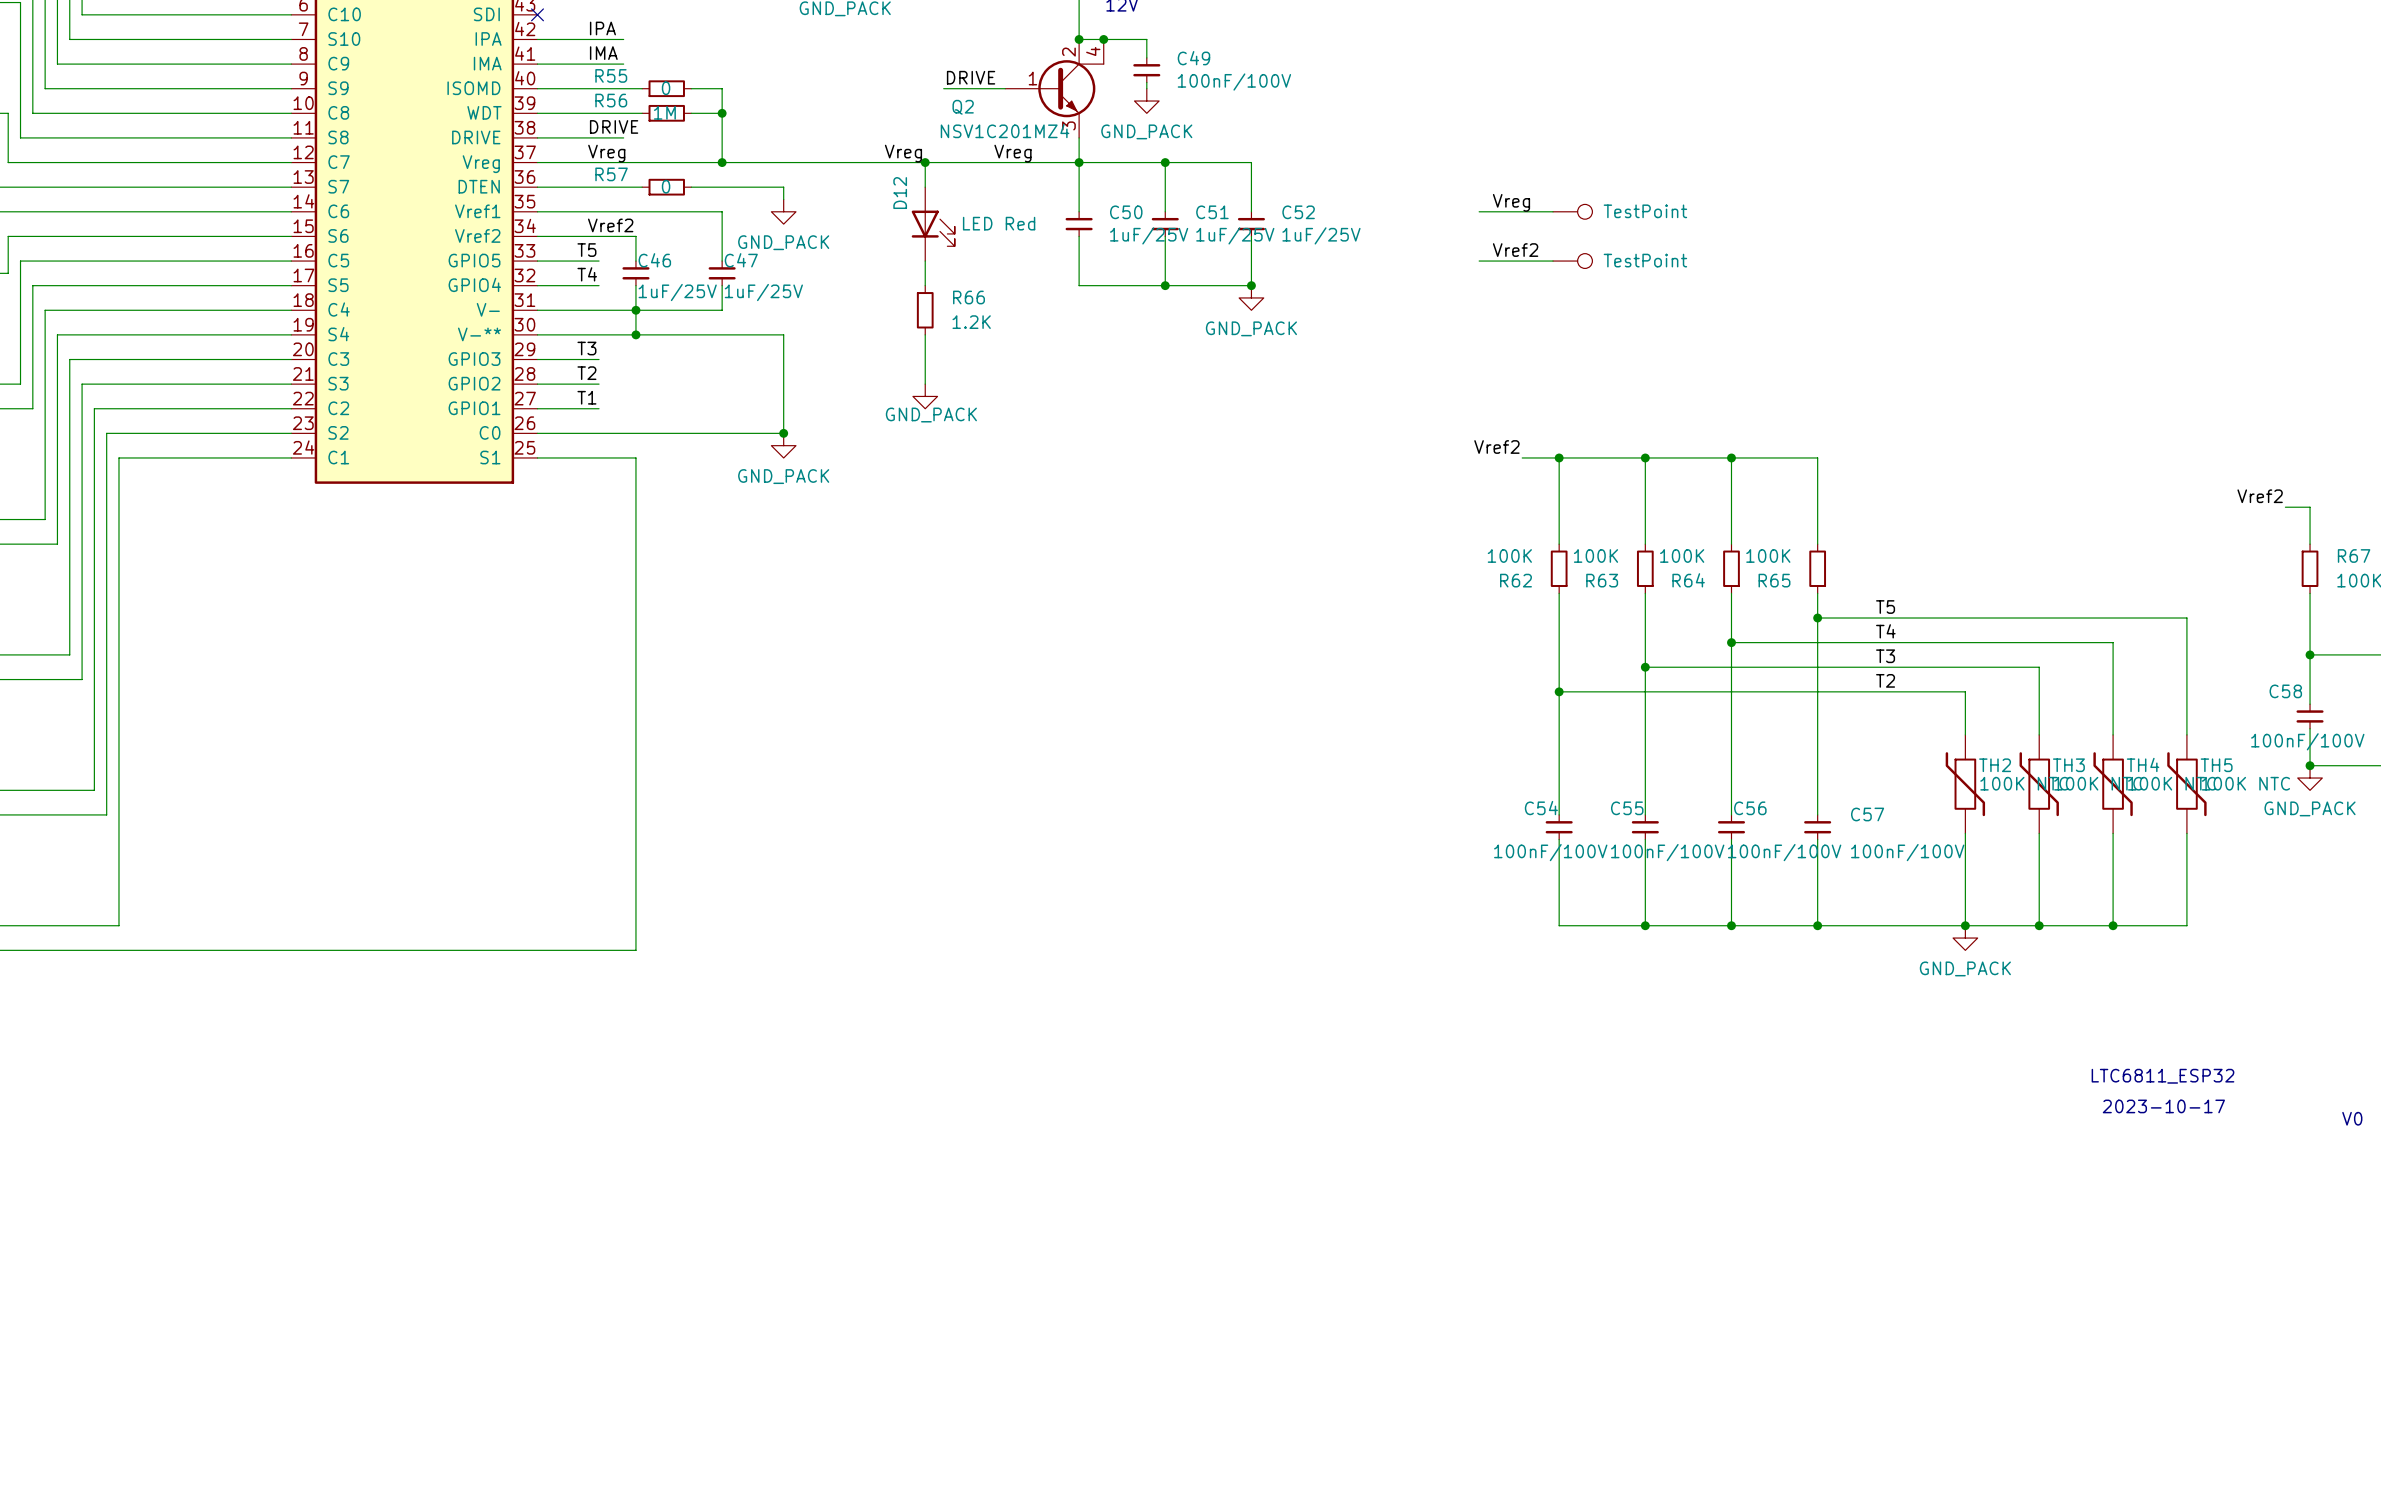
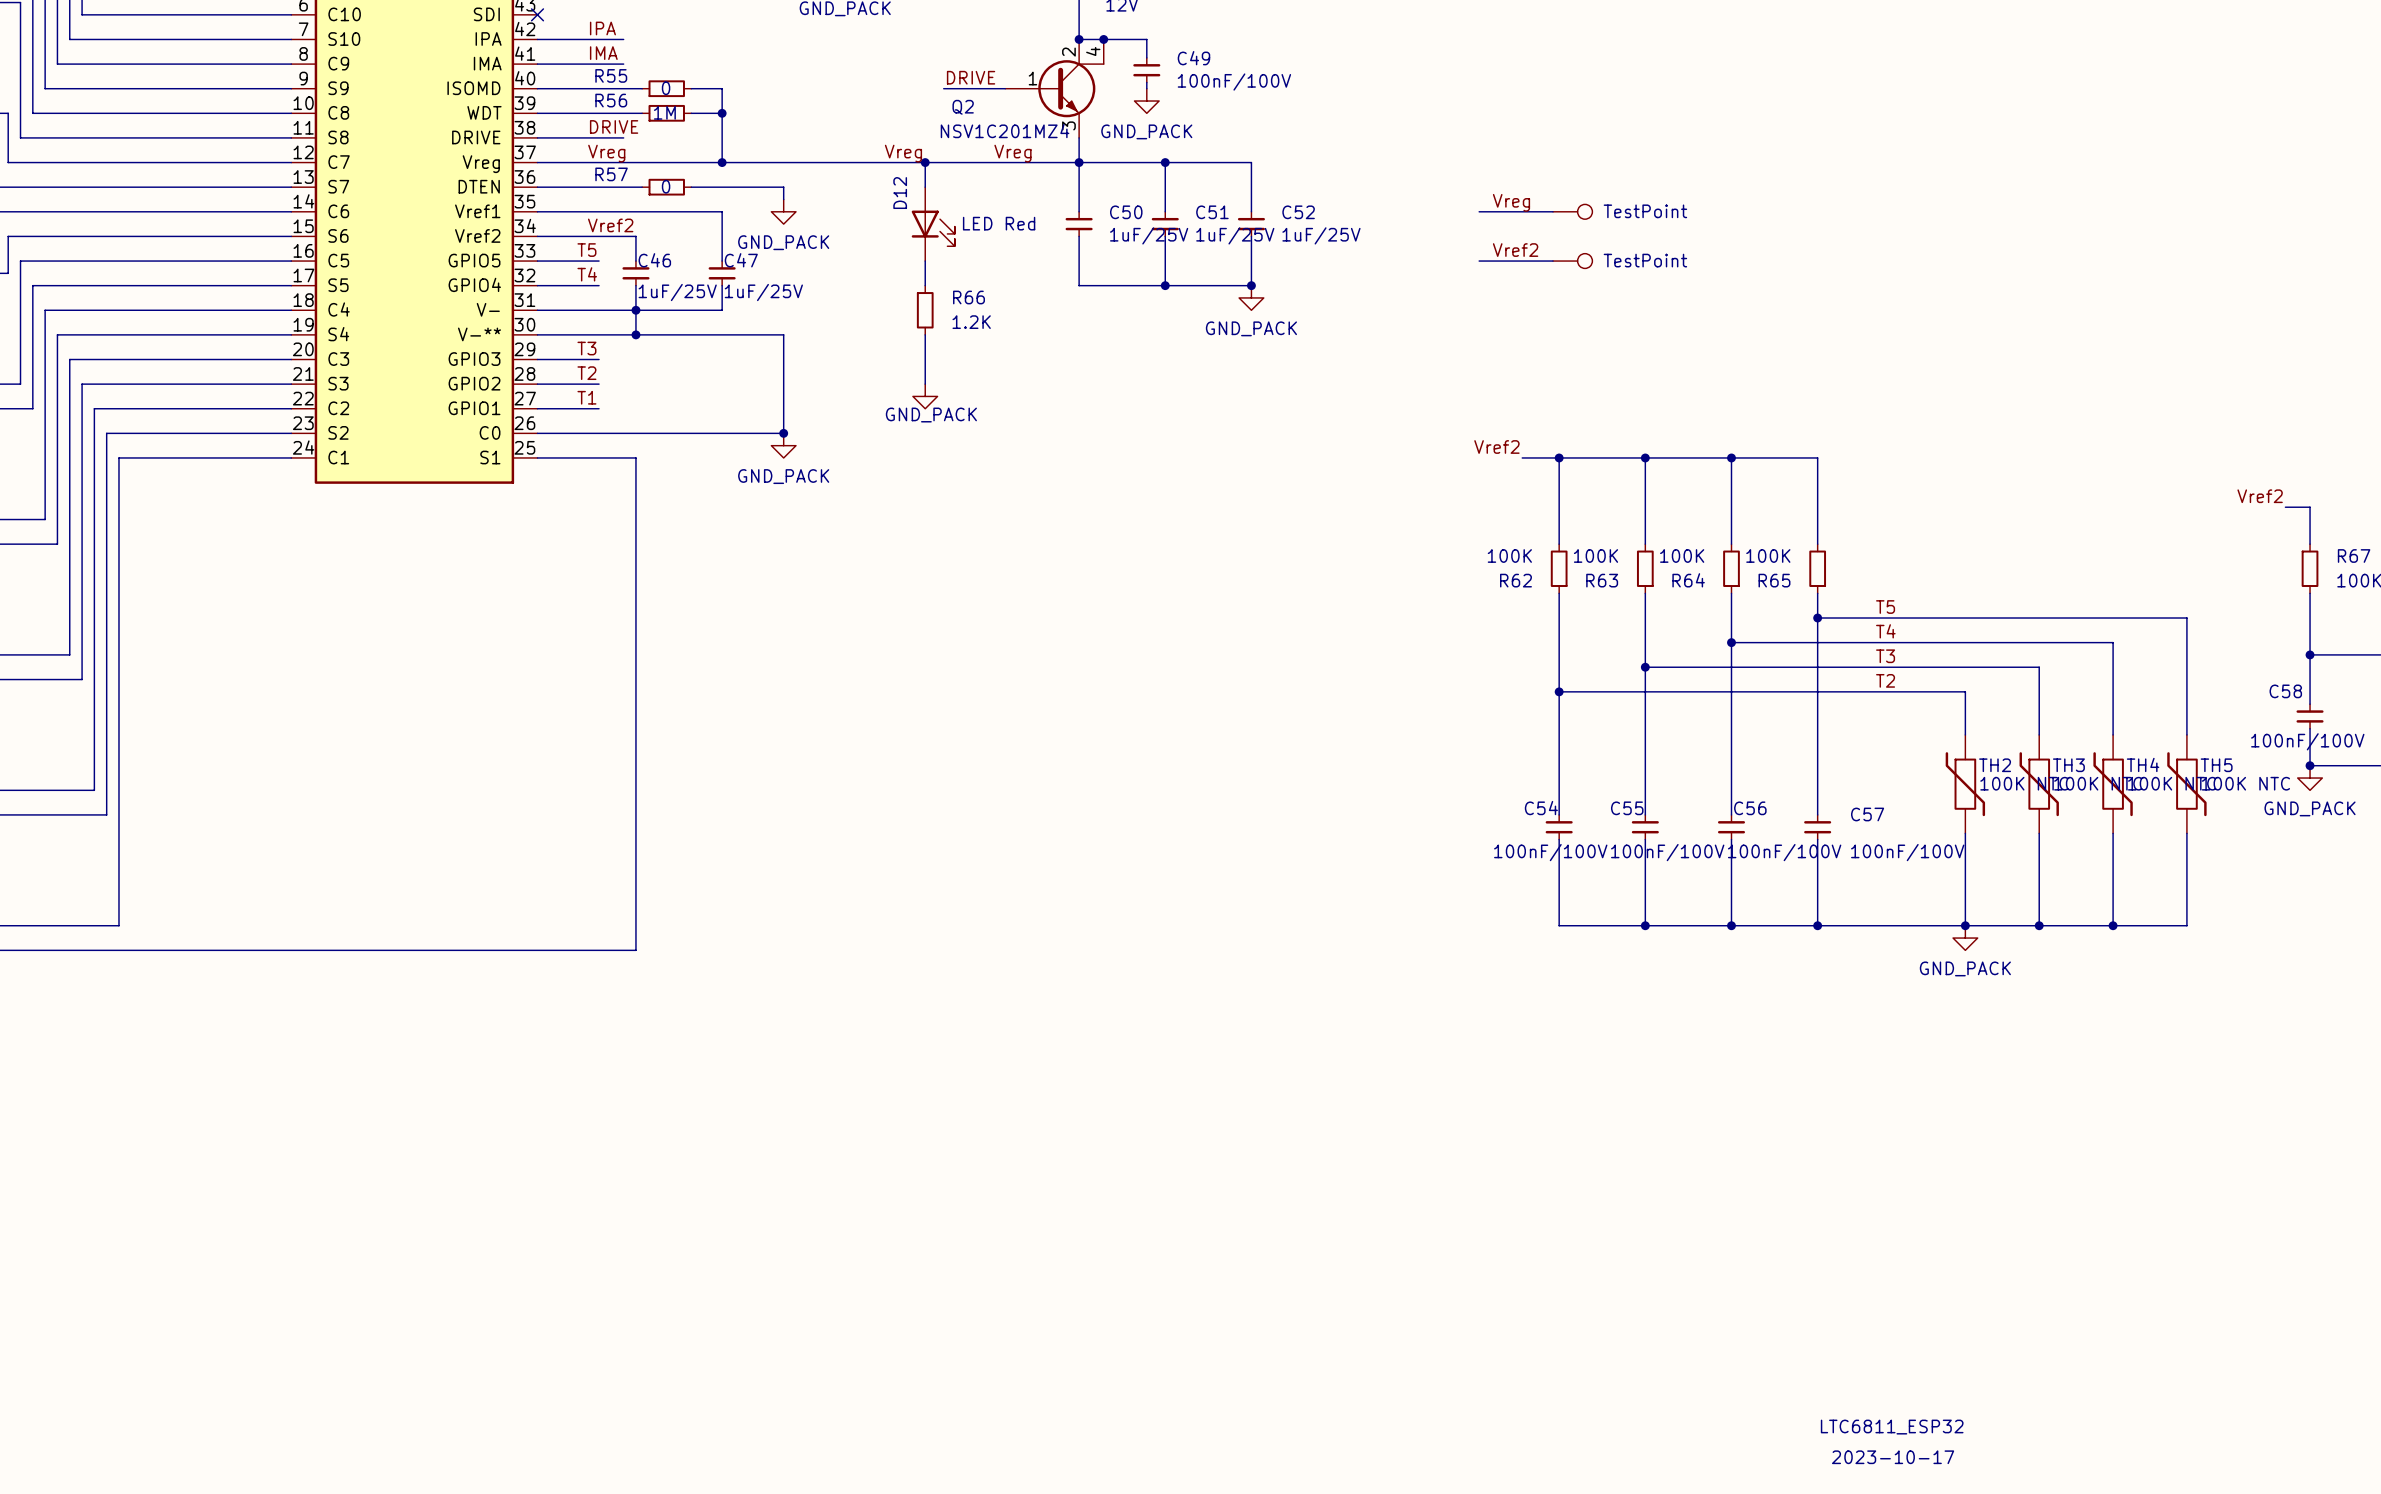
text: LTC6811_ESP32 (2162, 1076) -> none
text: 2023-10-17 (2163, 1106) -> none
text: V0 (2352, 1118) -> none
text: none -> LTC6811_ESP32 (1892, 1427)
text: none -> 2023-10-17 (1893, 1457)

